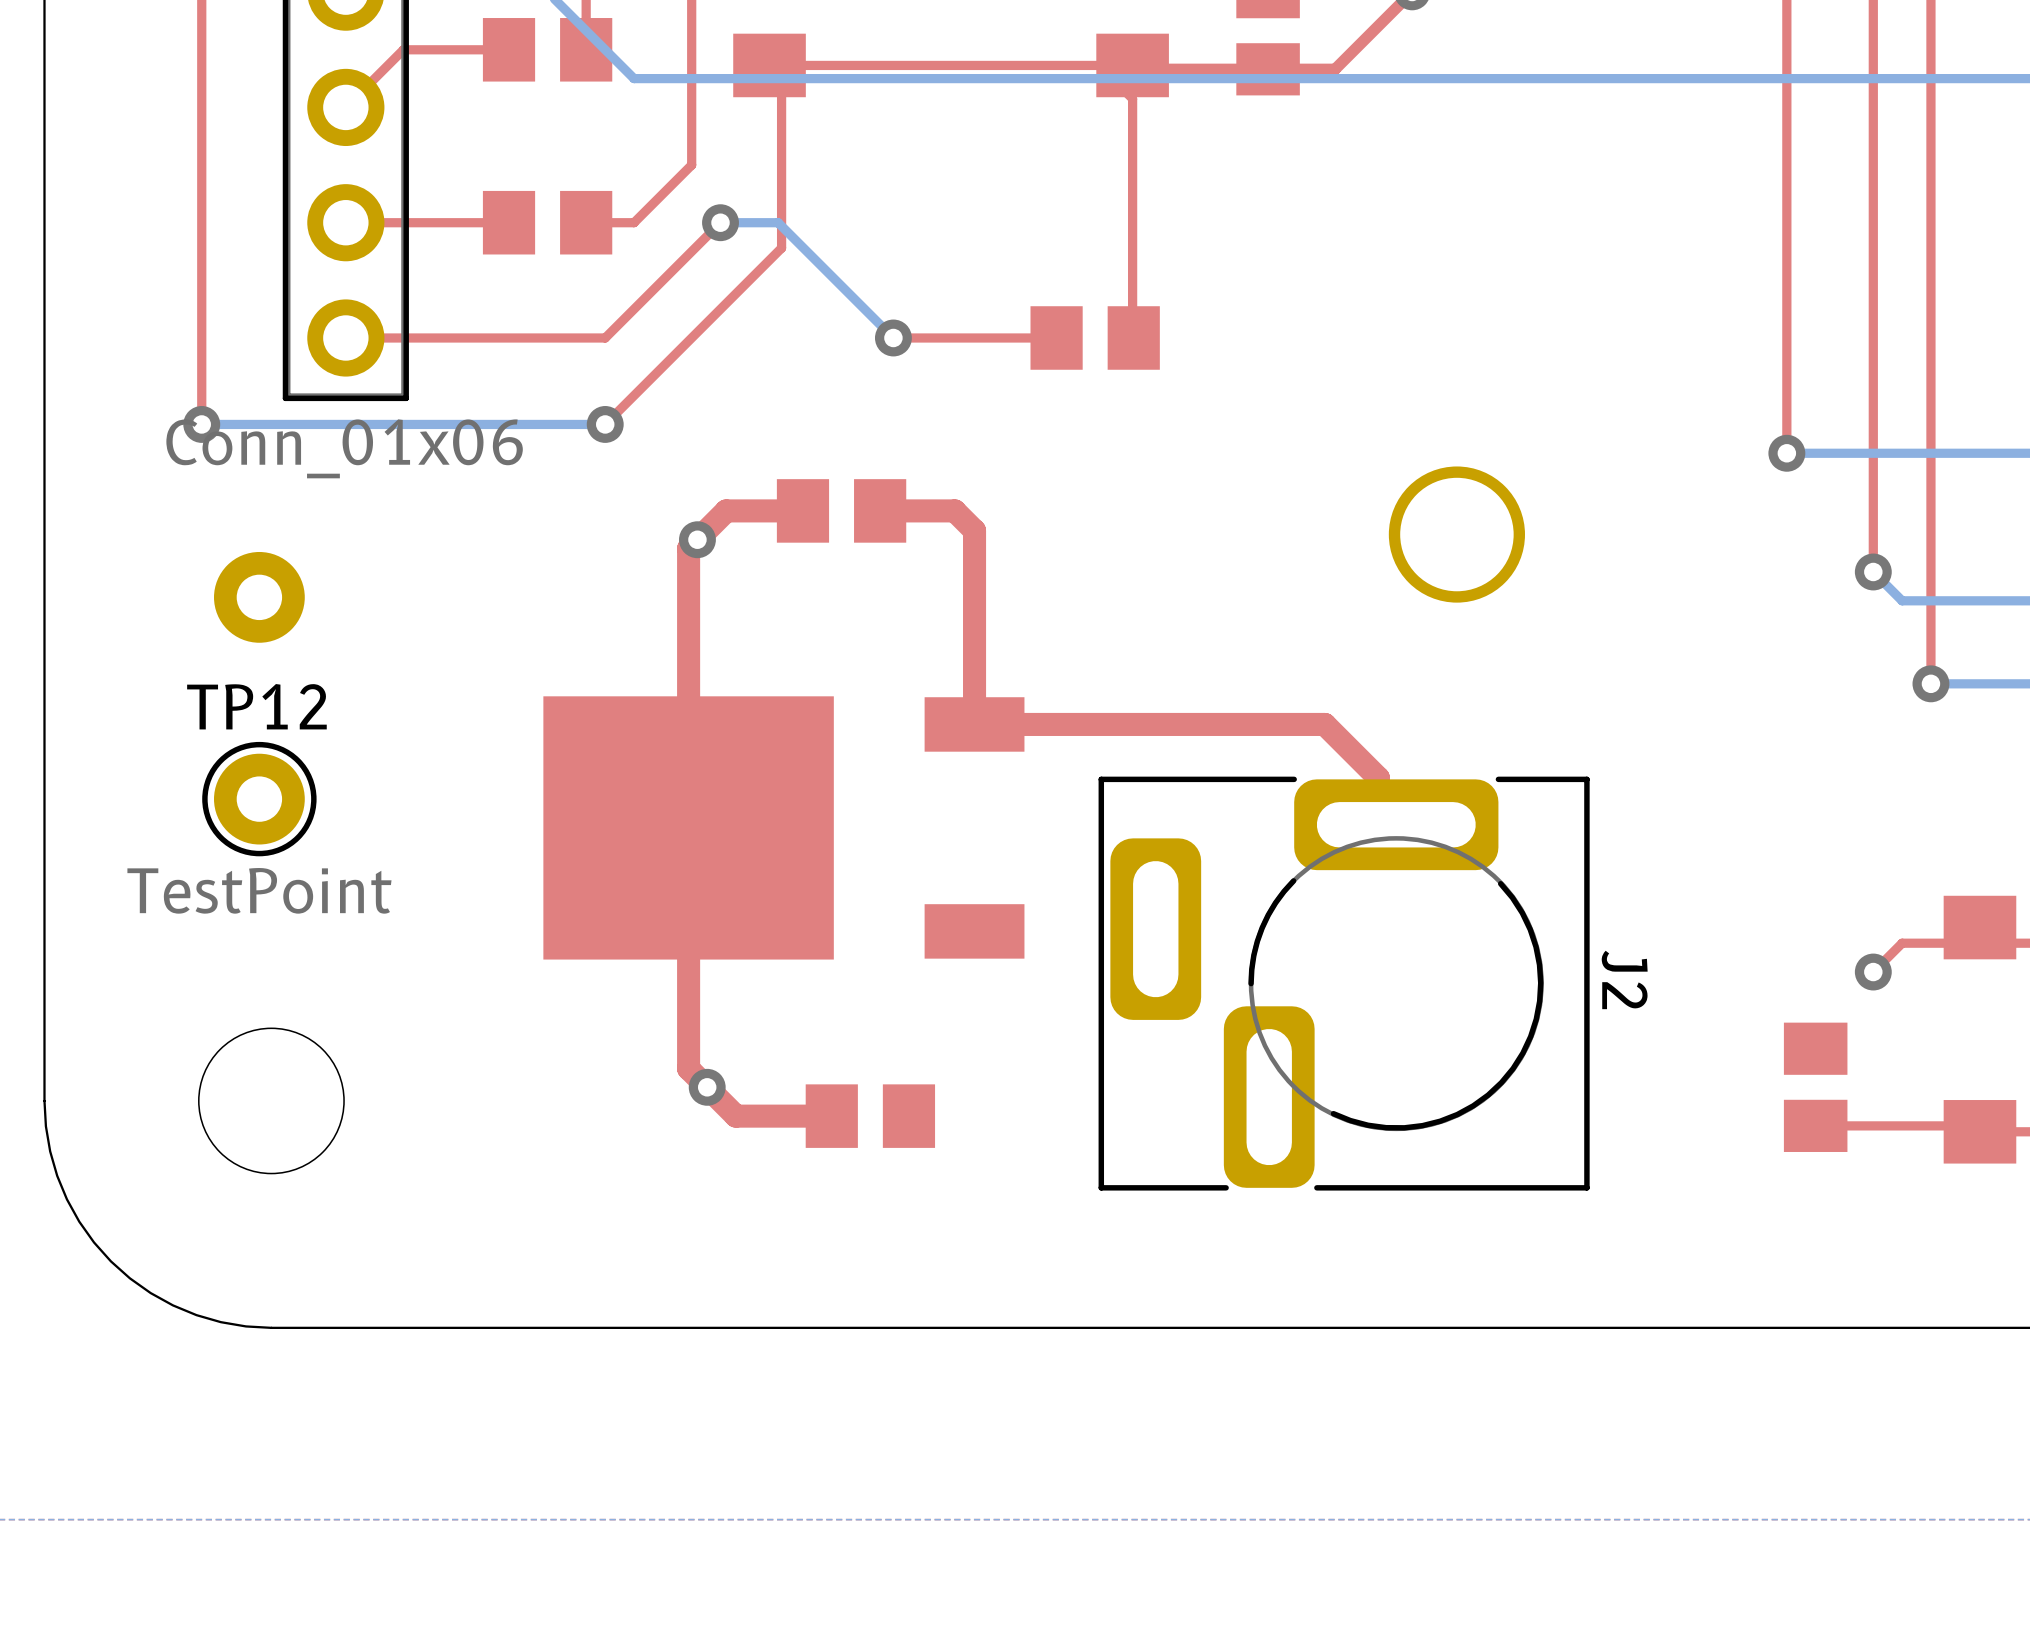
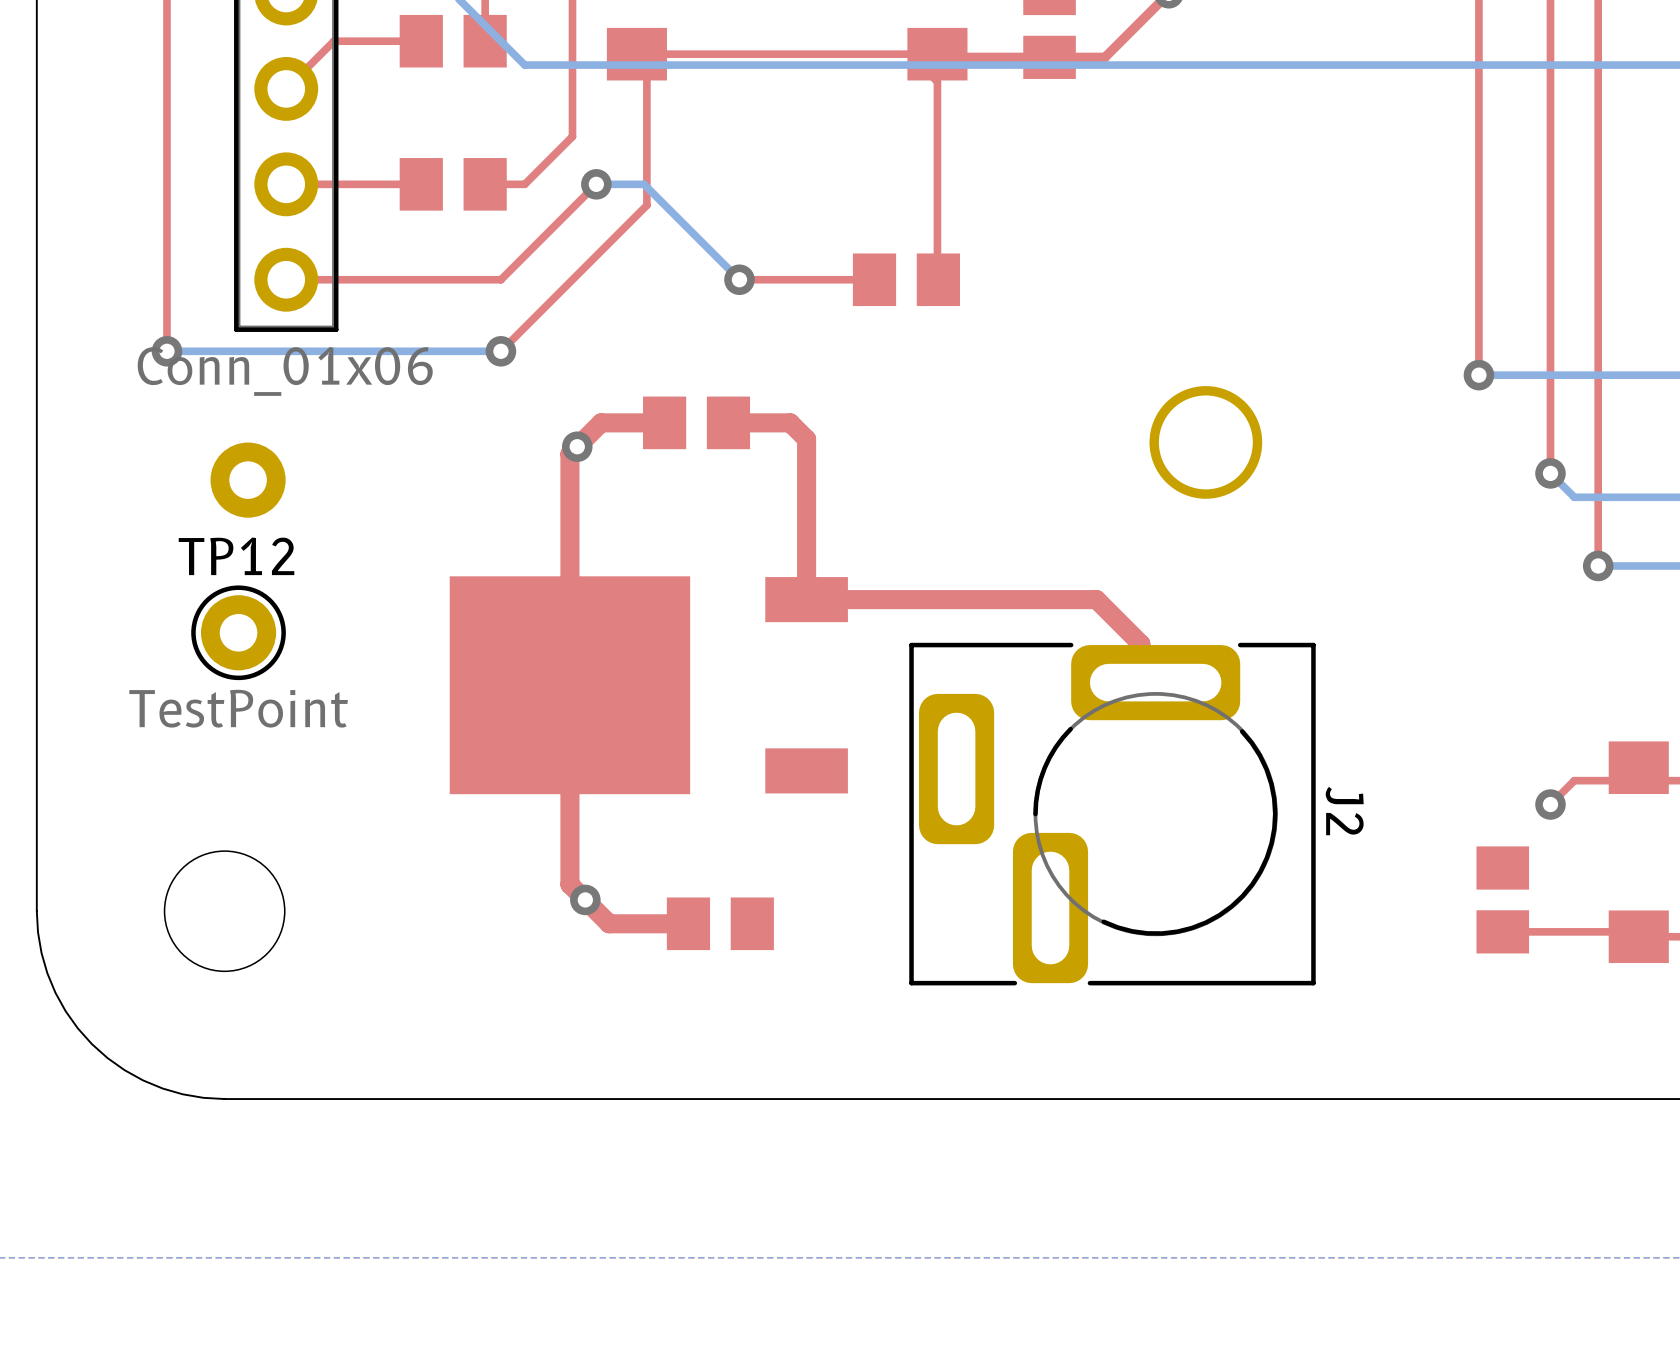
part position: (259, 597) -> (248, 480)
TP12 position: (259, 799) -> (238, 632)

